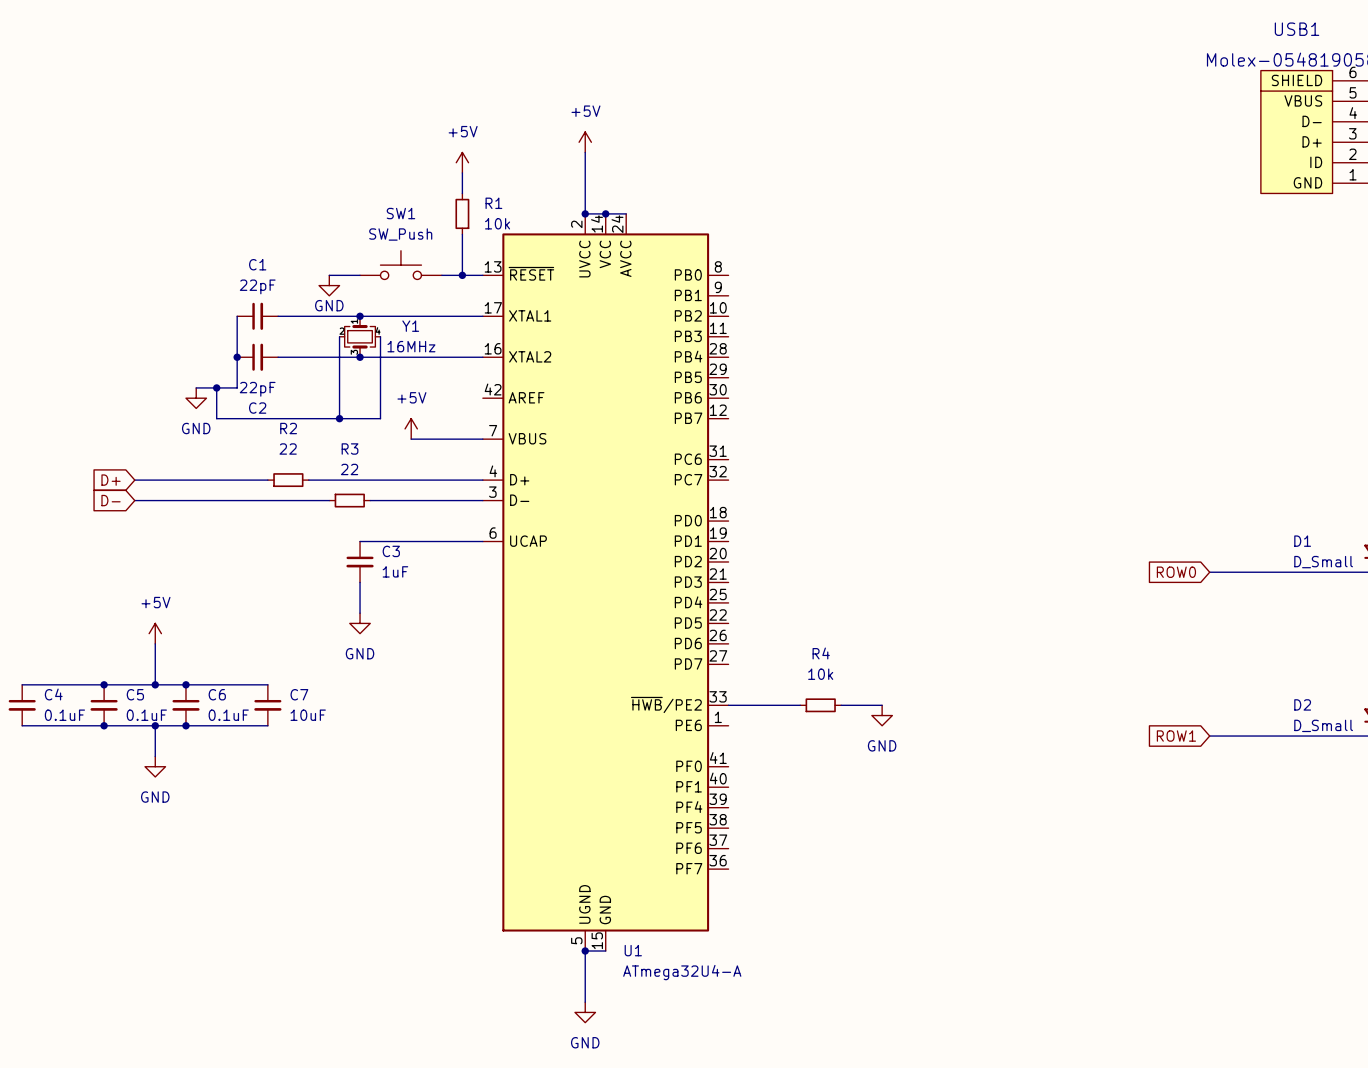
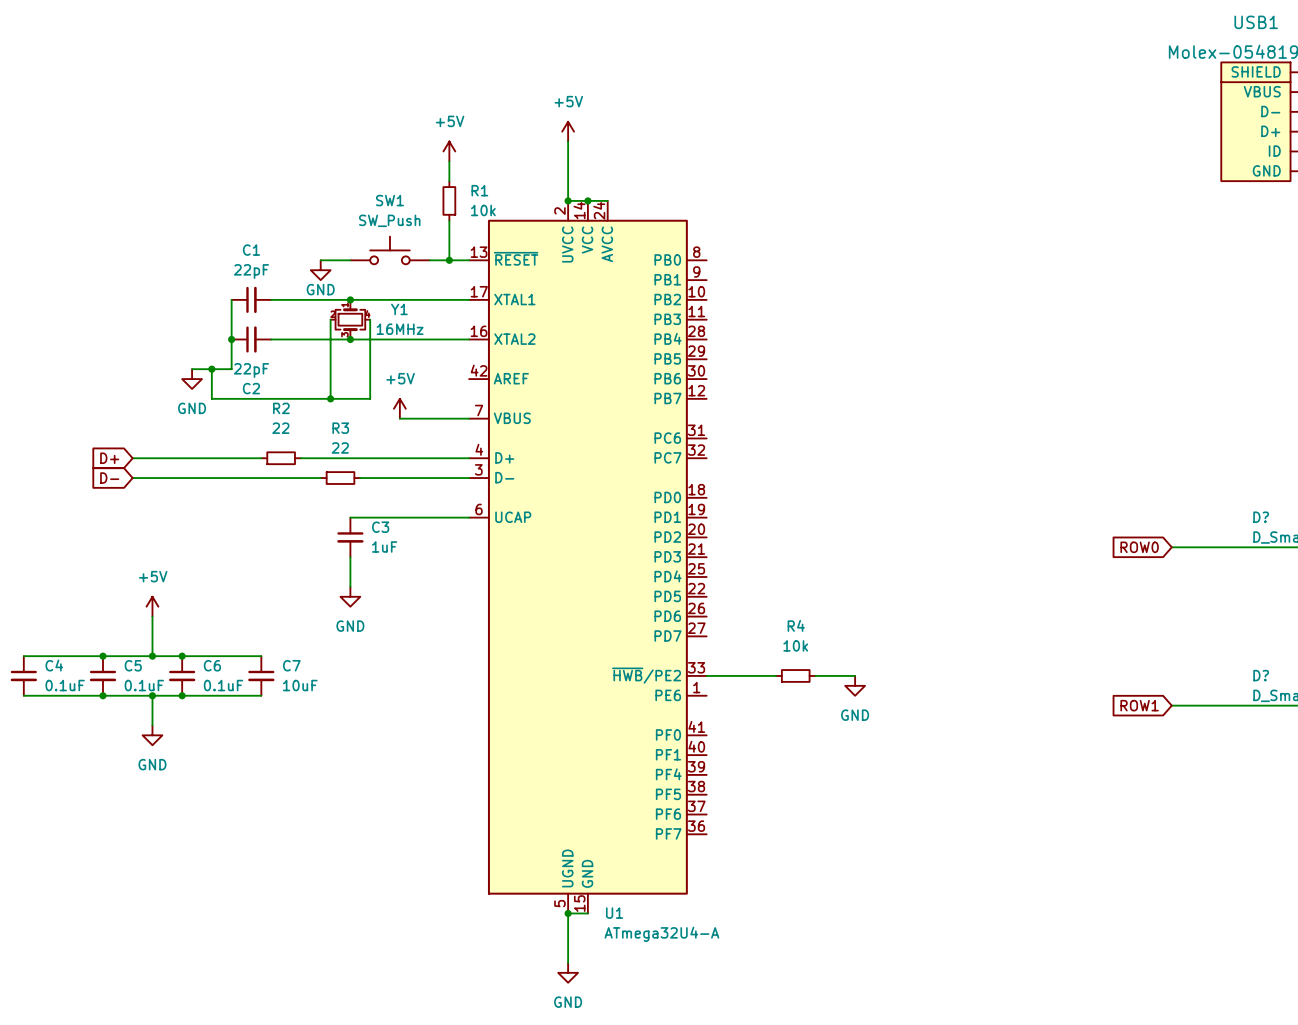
D1 name: D1 (1302, 541) -> D? (1261, 517)
D2 name: D2 (1302, 704) -> D? (1261, 675)

